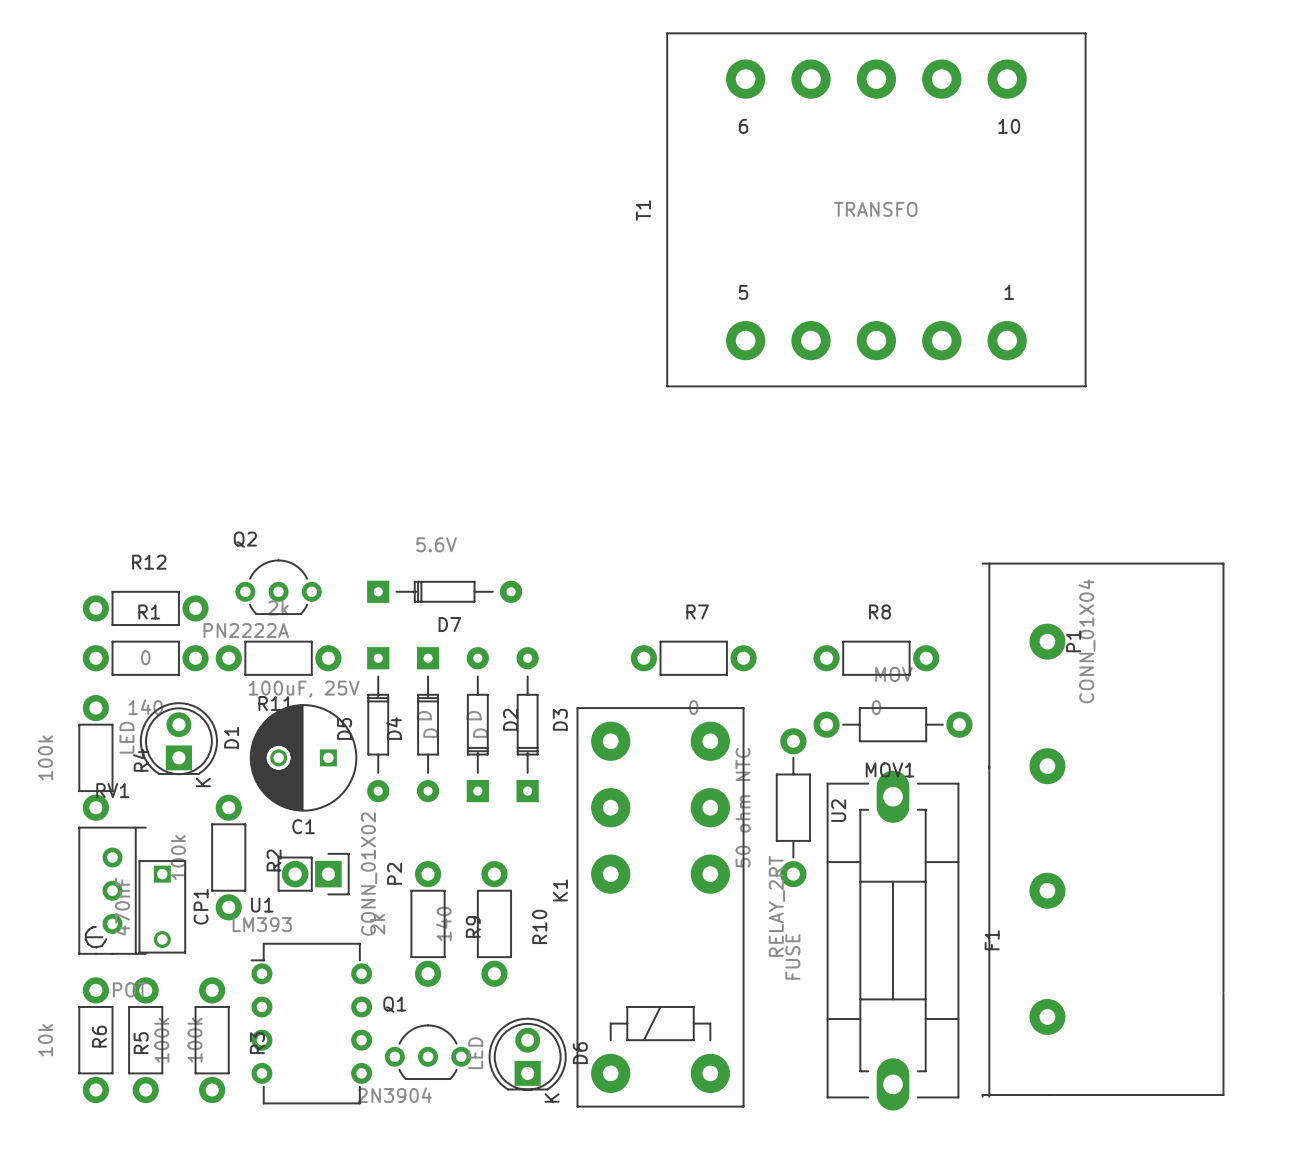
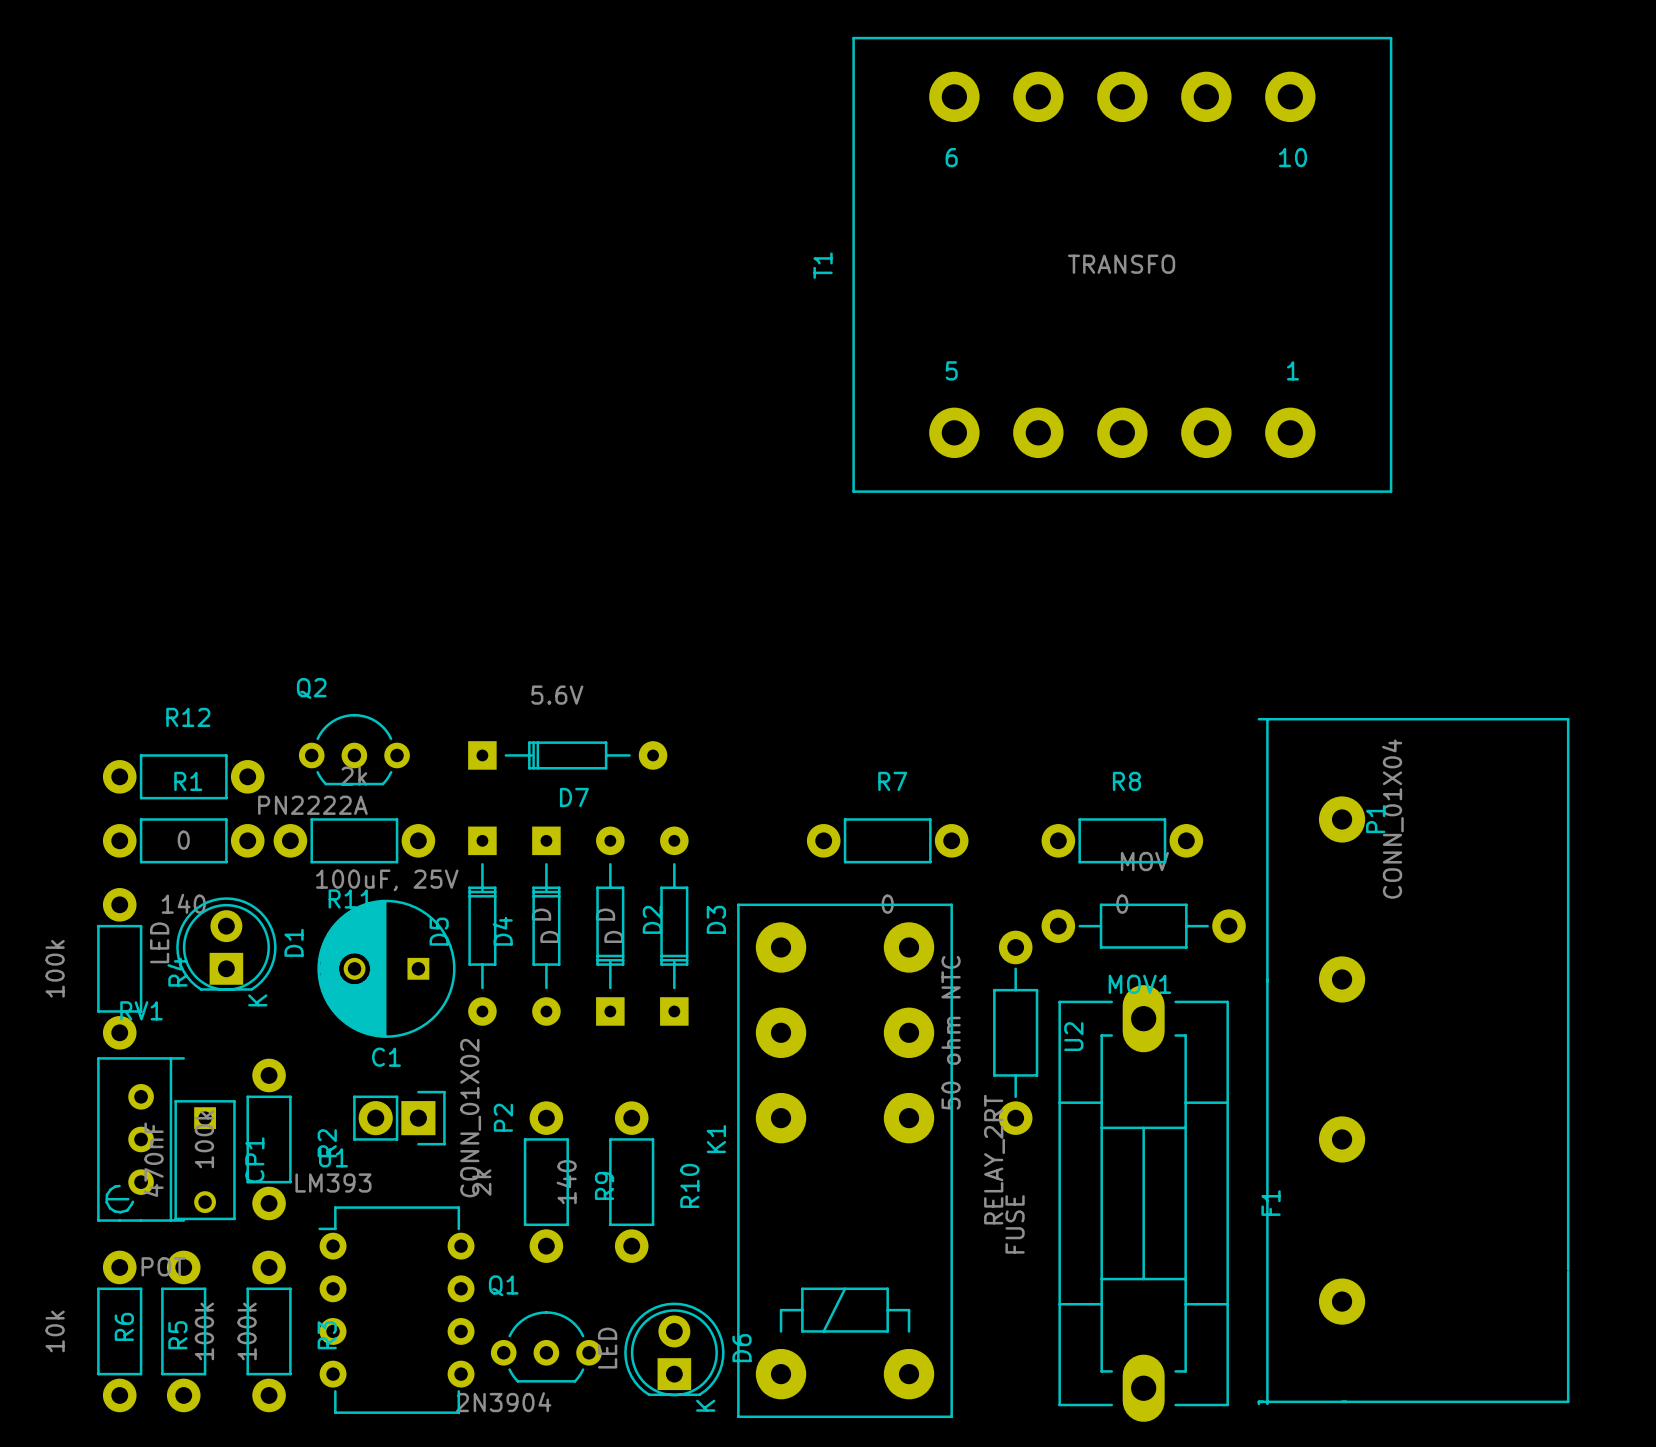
R2 position: (228, 857) -> (269, 1139)

